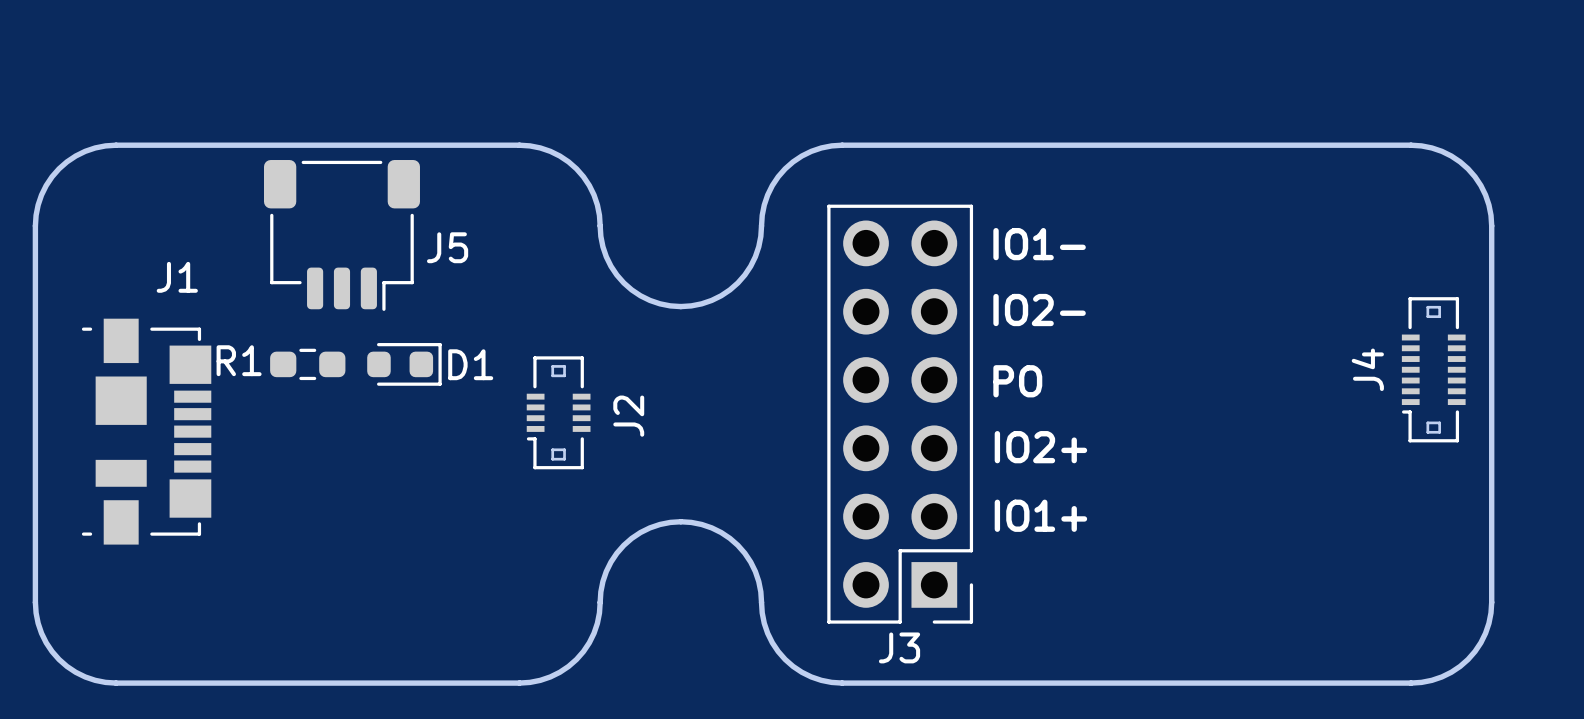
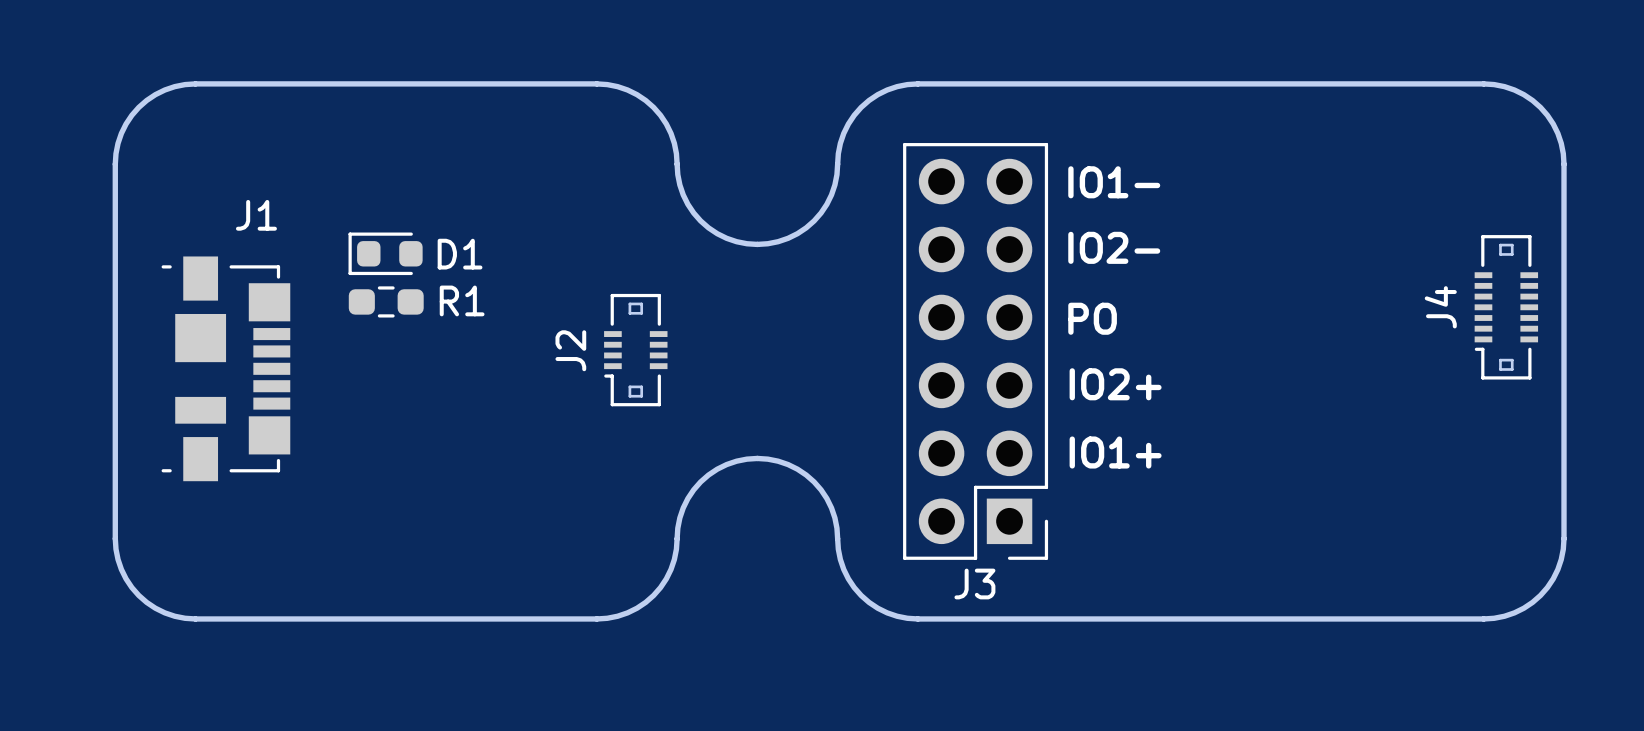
J5: (341, 235) -> none
R1 name position: R1 (239, 360) -> R1 (462, 300)
D1 rotation: 0° (404, 364) -> 180° (385, 253)
D1 position: (404, 364) -> (385, 253)
J2 name position: J2 (628, 416) -> J2 (570, 350)

